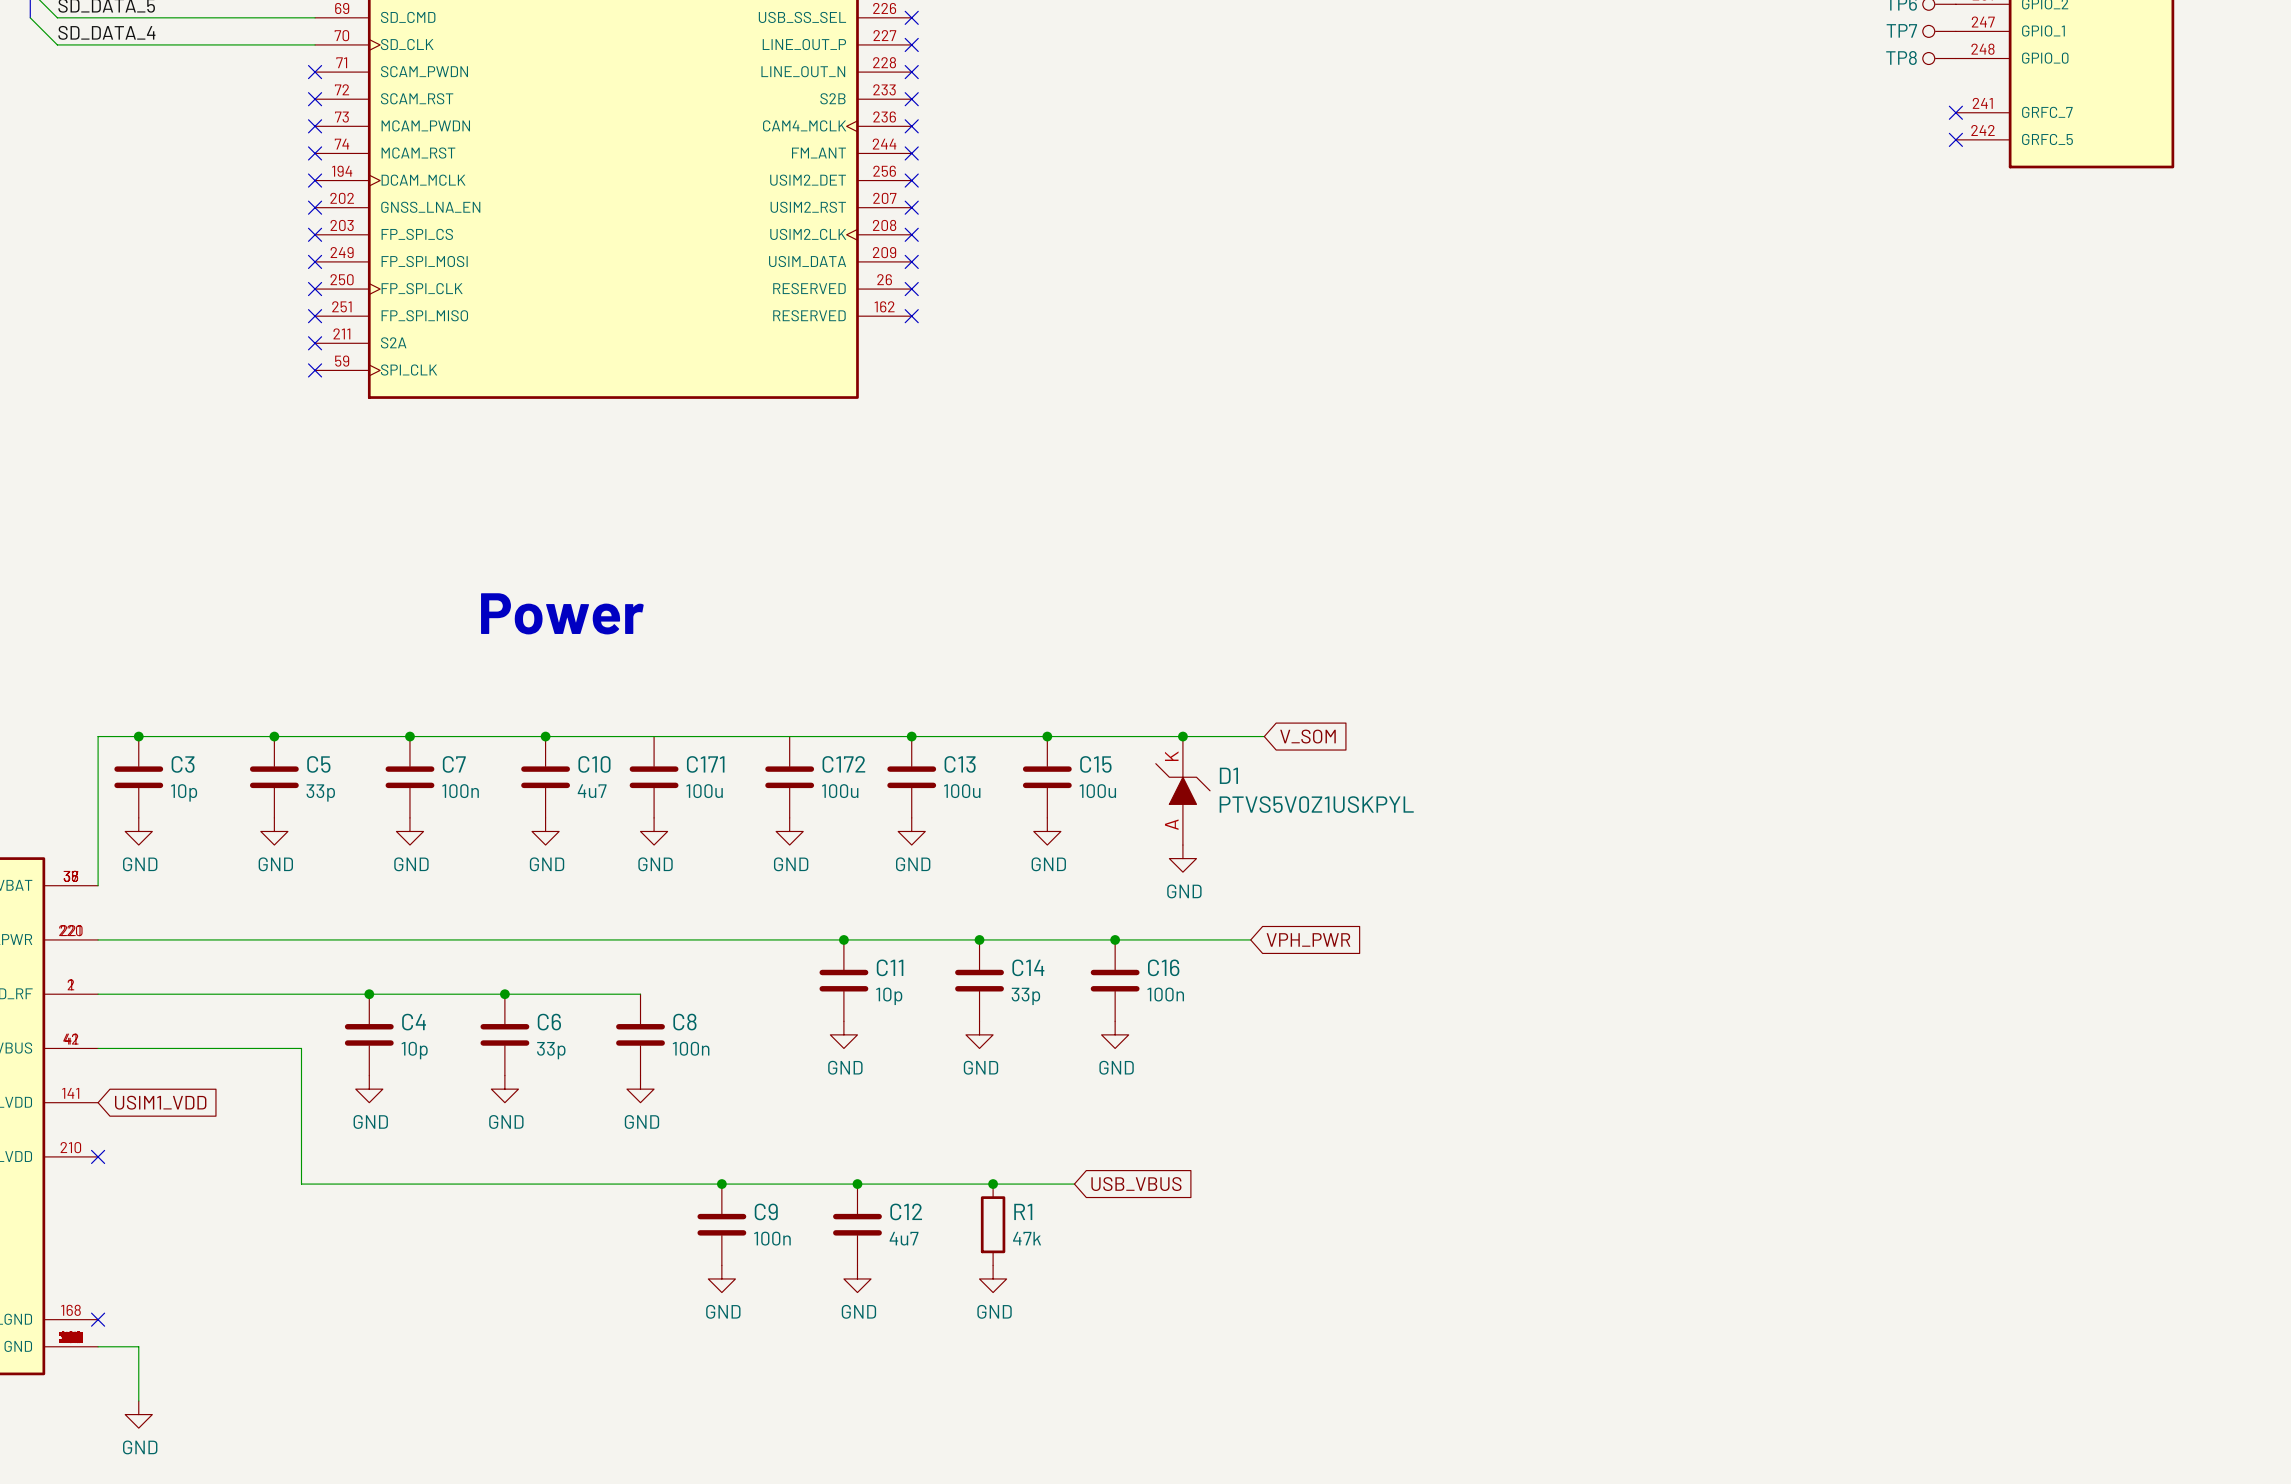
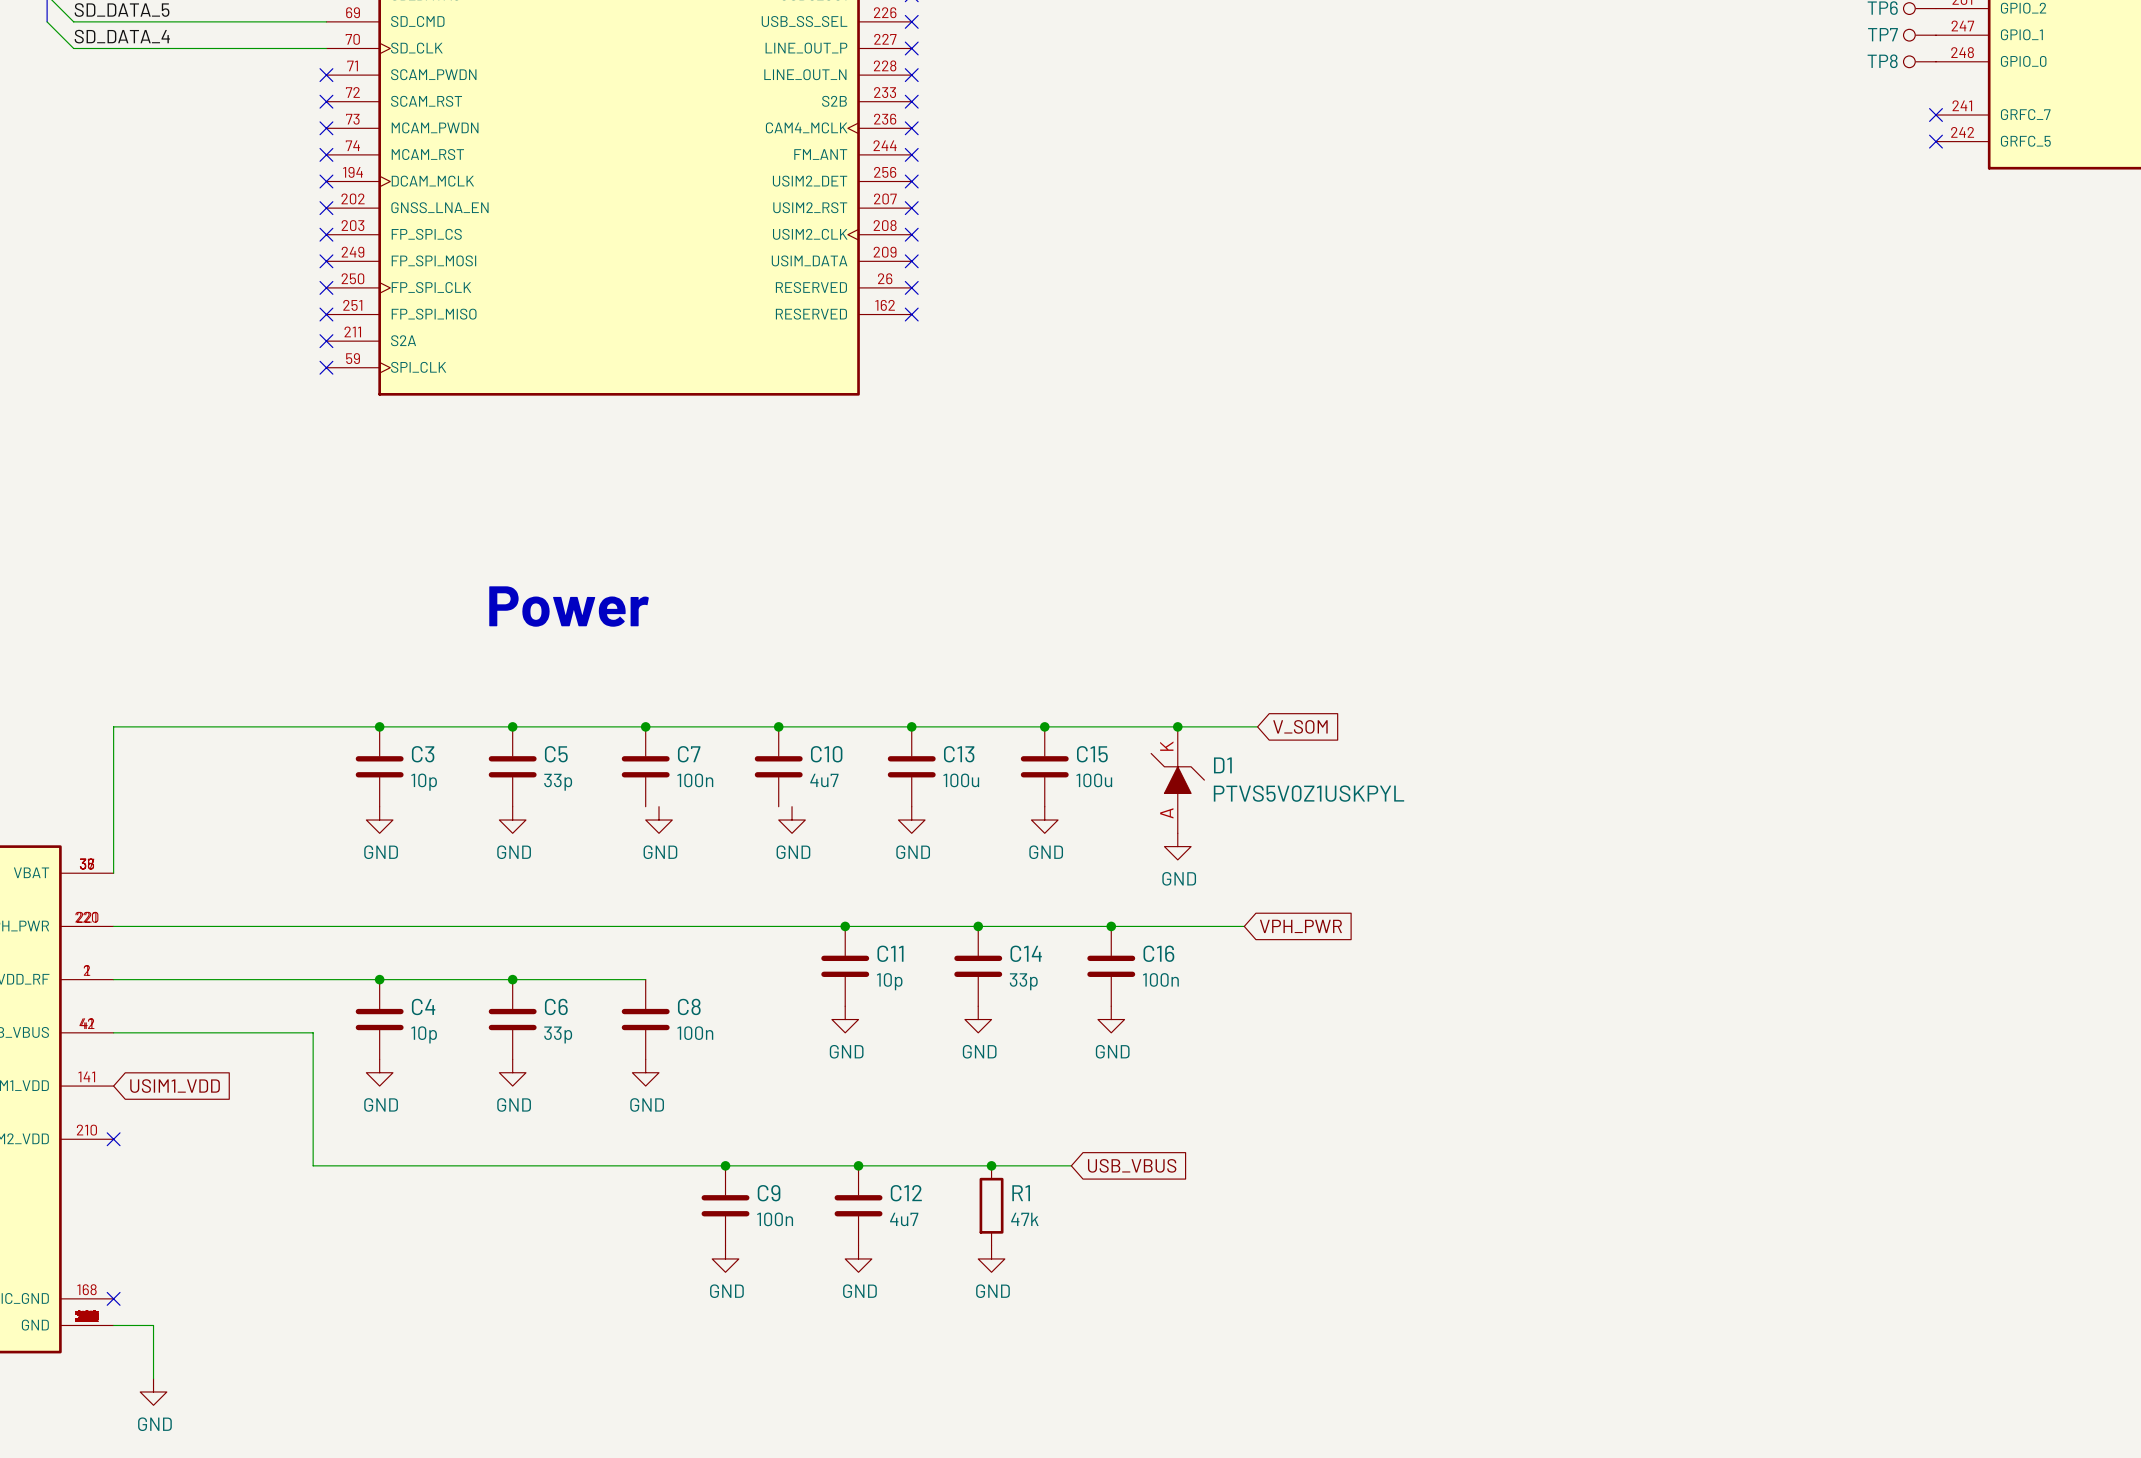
junction: (138, 736) -> none
junction: (274, 736) -> none
junction position: (409, 736) -> (379, 726)
junction position: (545, 736) -> (512, 726)
junction: none -> (645, 726)
junction: none -> (778, 726)
C3 position: (138, 777) -> (379, 766)
C5 position: (274, 777) -> (512, 766)
C7 position: (409, 777) -> (645, 766)
C10 position: (545, 777) -> (778, 766)
C171: (654, 777) -> none
C172: (789, 777) -> none
power symbol: GND (138, 831) -> none
power symbol: GND (274, 831) -> none
power symbol position: GND (409, 831) -> GND (379, 820)
power symbol position: GND (545, 831) -> GND (512, 820)

